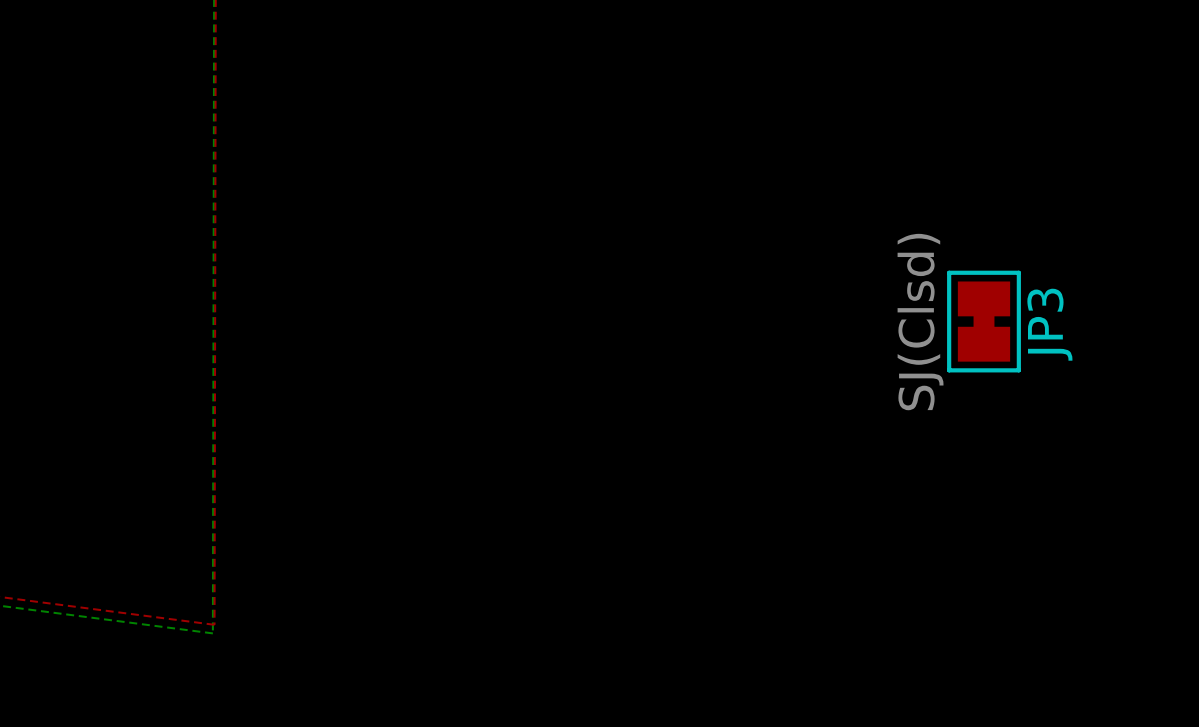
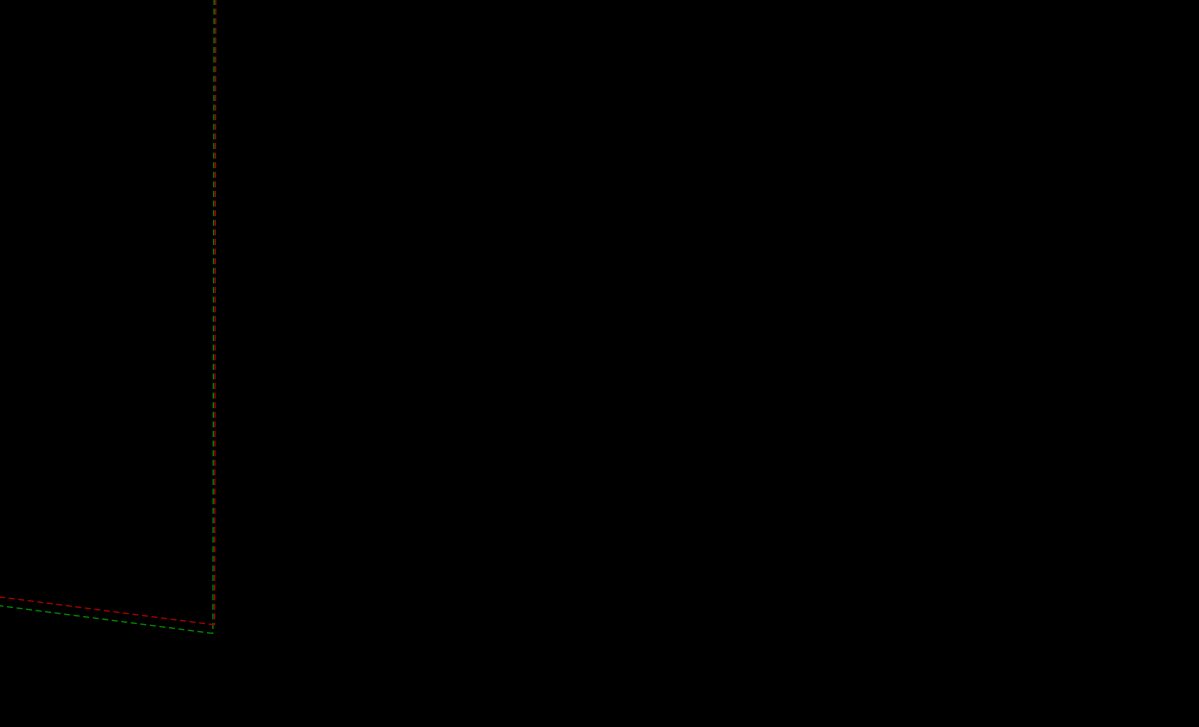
JP3: SJ(Clsd) (984, 321) -> none

